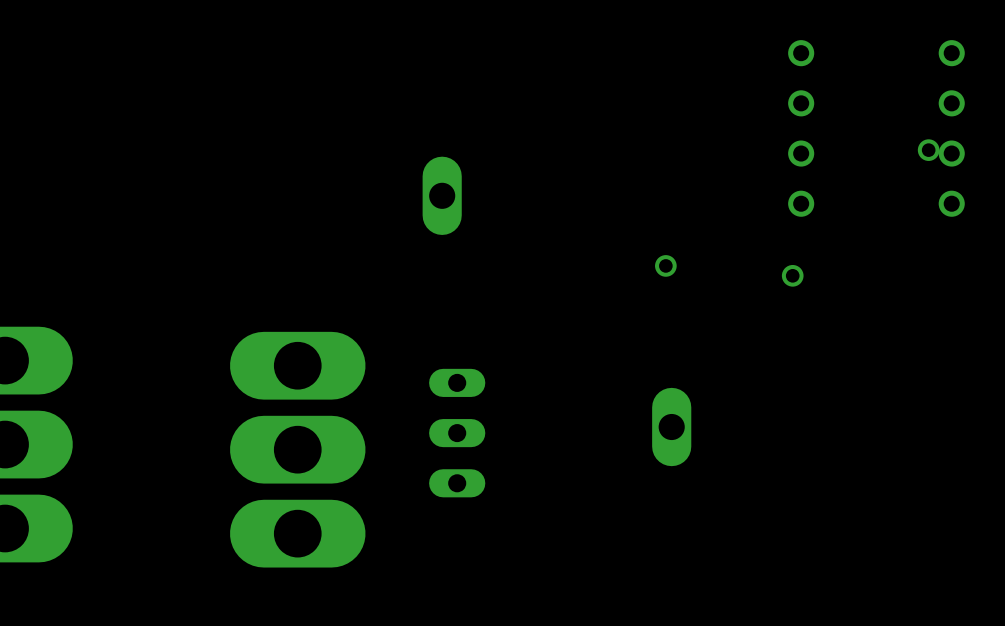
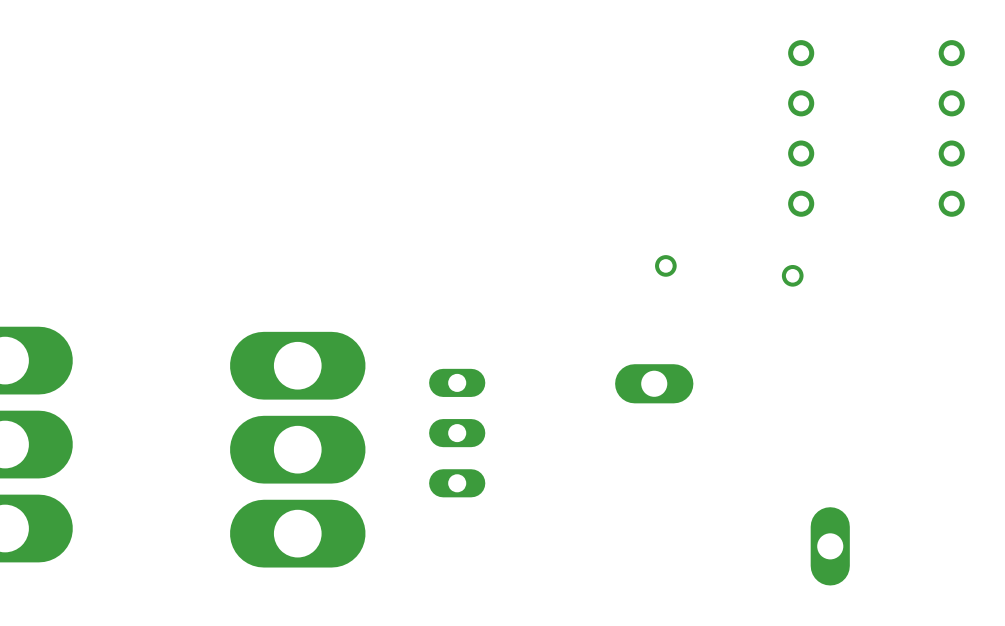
via: (928, 150) -> none
part: (442, 195) -> none
part rotation: 0° (671, 427) -> 90° clockwise (654, 383)
part: none -> (830, 546)

